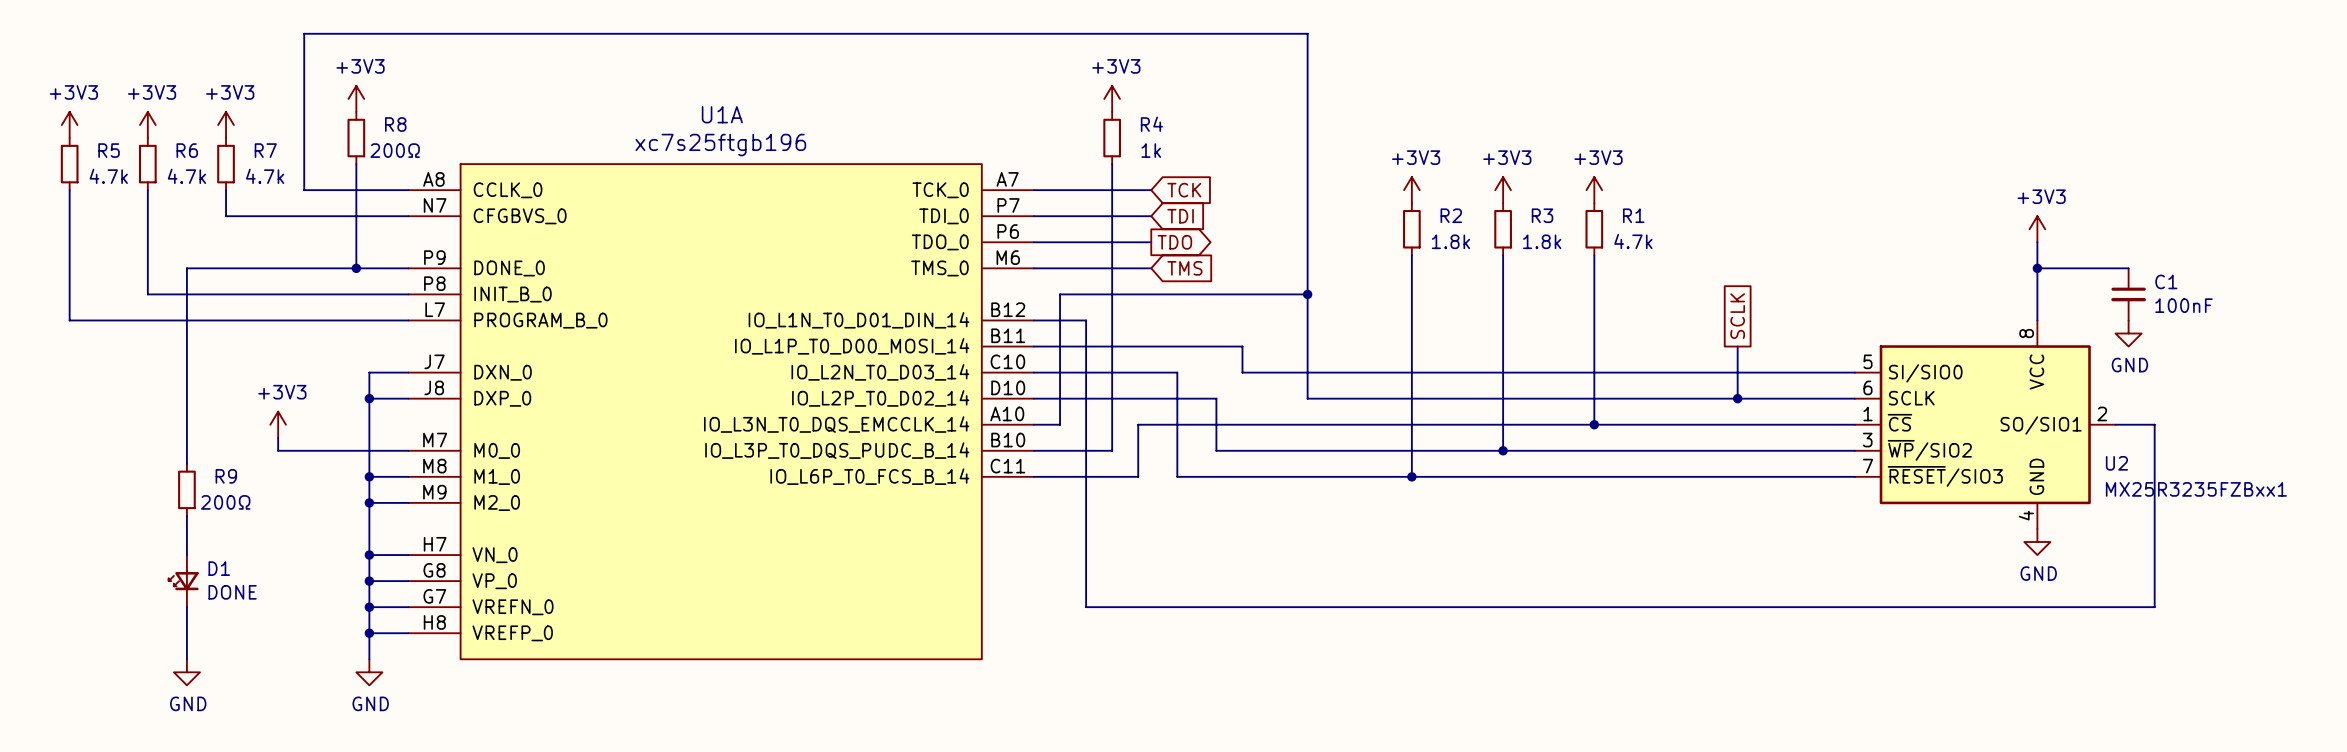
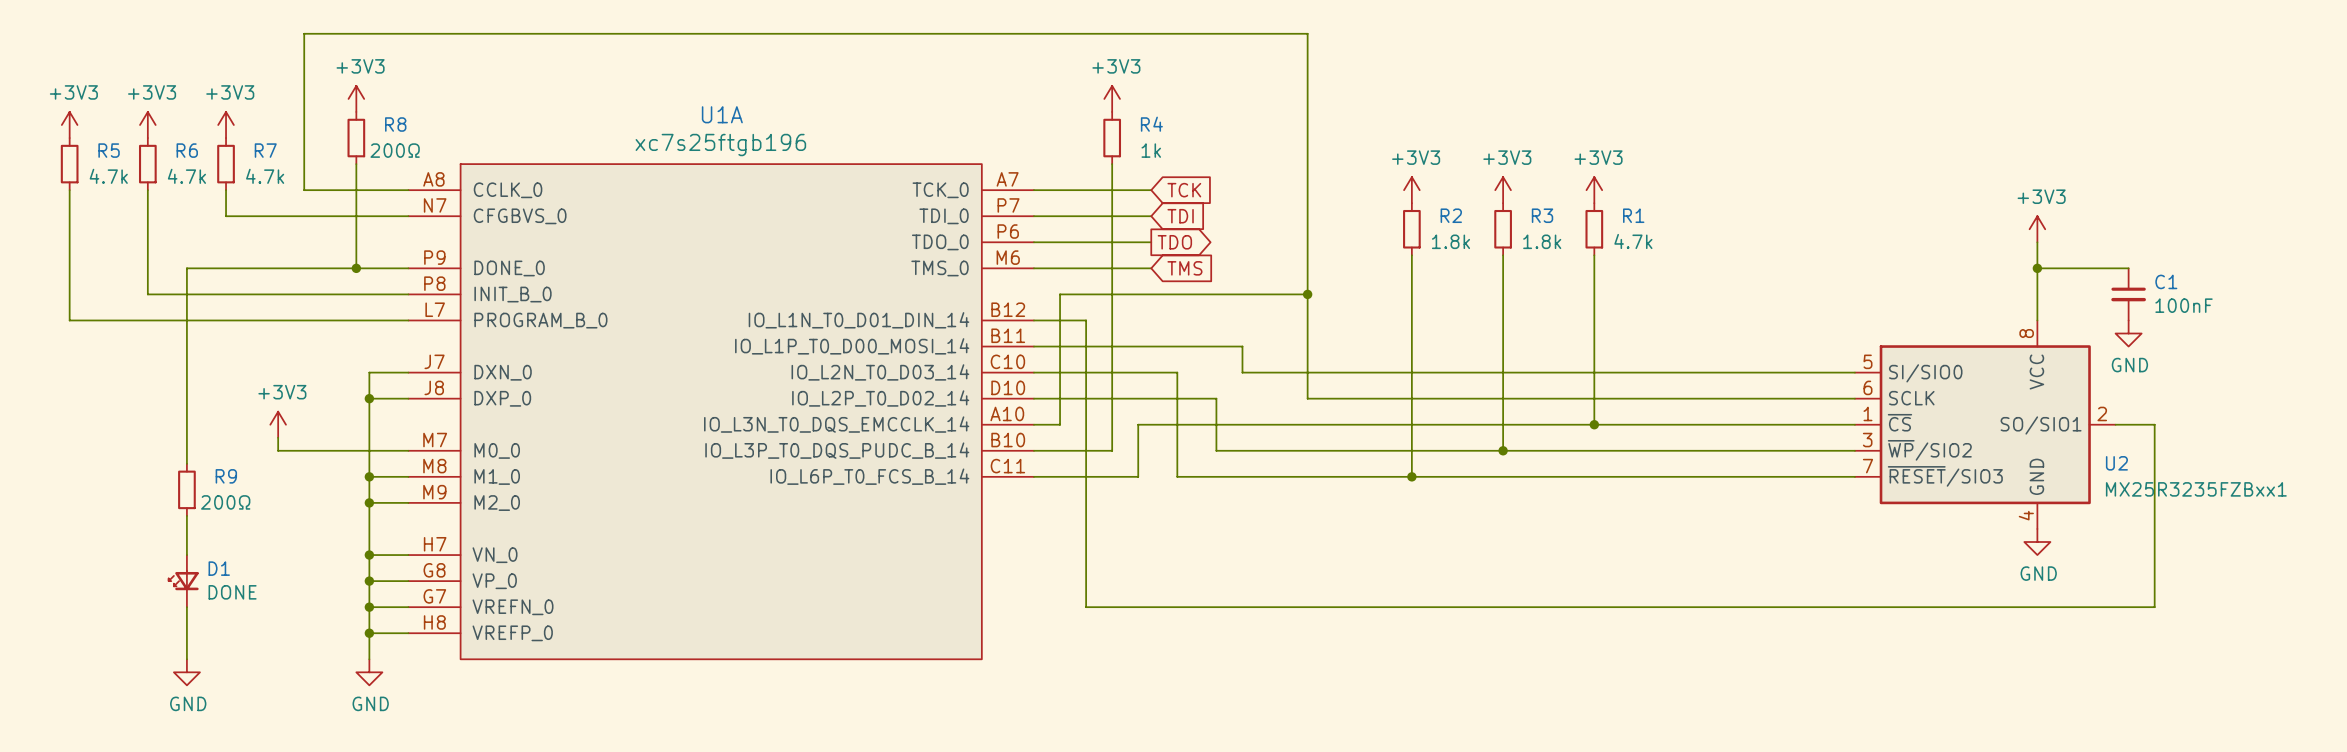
global label: SCLK (1737, 316) -> none
wire: (1737, 346) (1737, 398) -> none
junction: (1737, 398) -> none

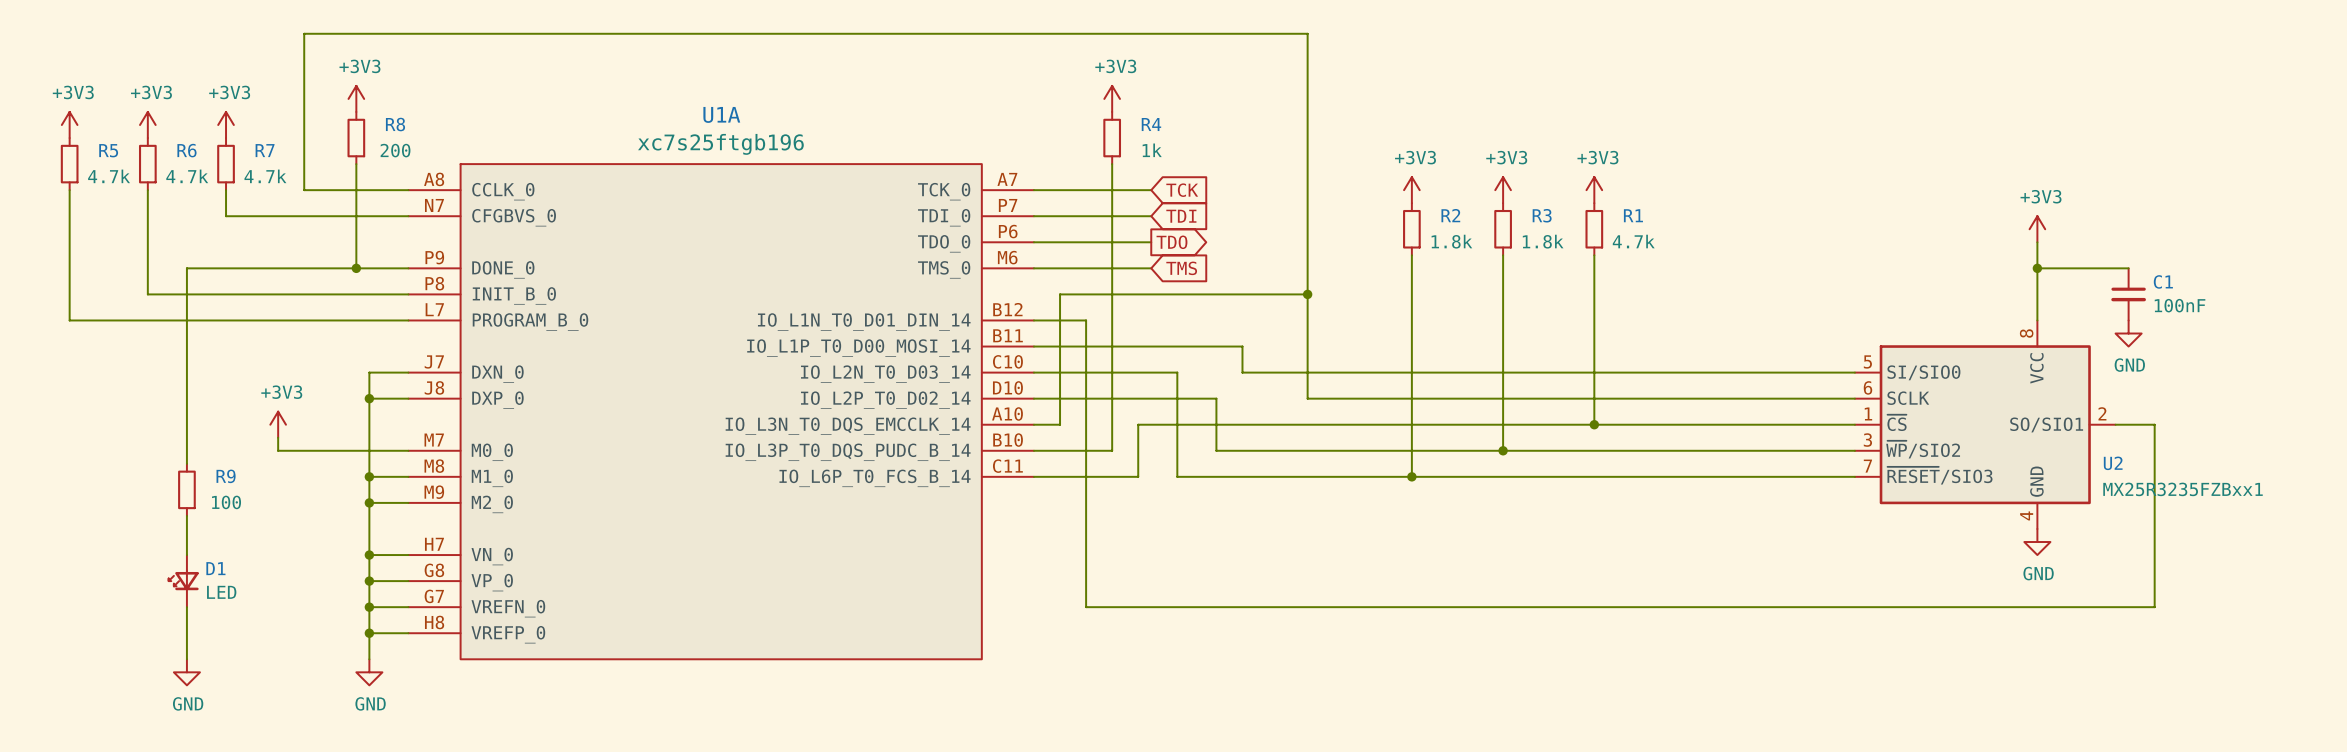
R8 value: 200Ω (395, 150) -> 200 (395, 150)
R9 value: 200Ω (225, 502) -> 100 (226, 502)
D1 value: DONE (232, 592) -> LED (221, 592)

